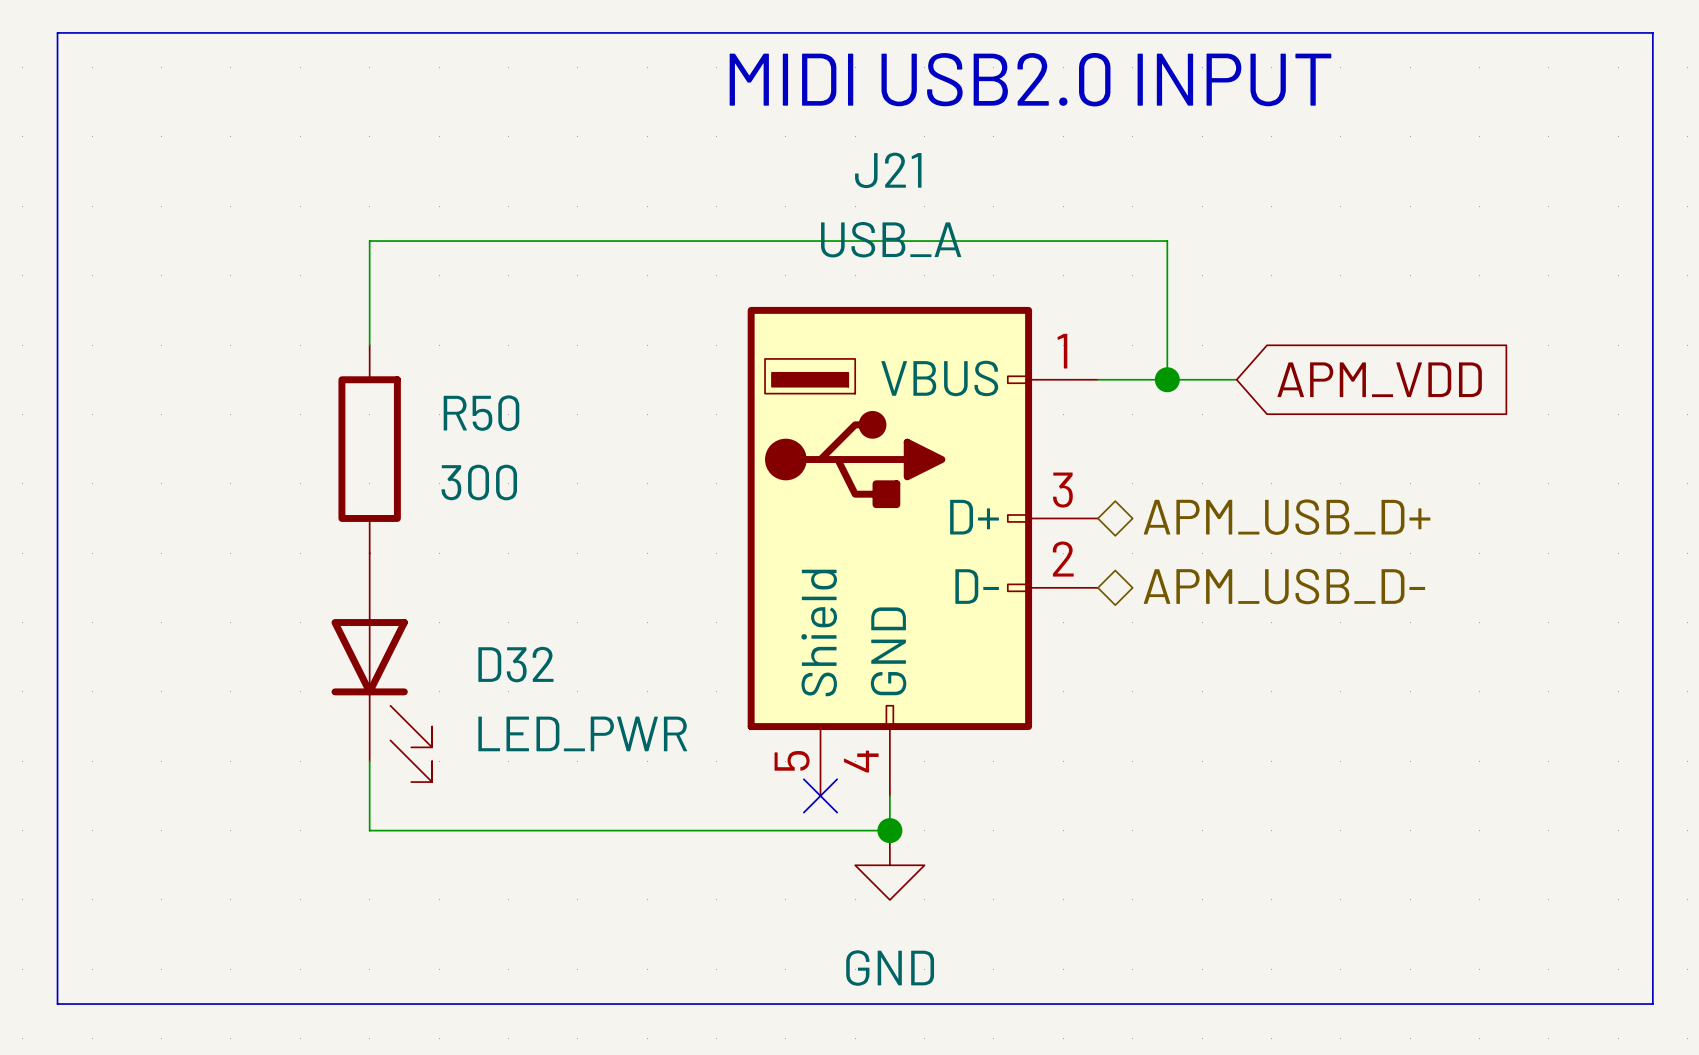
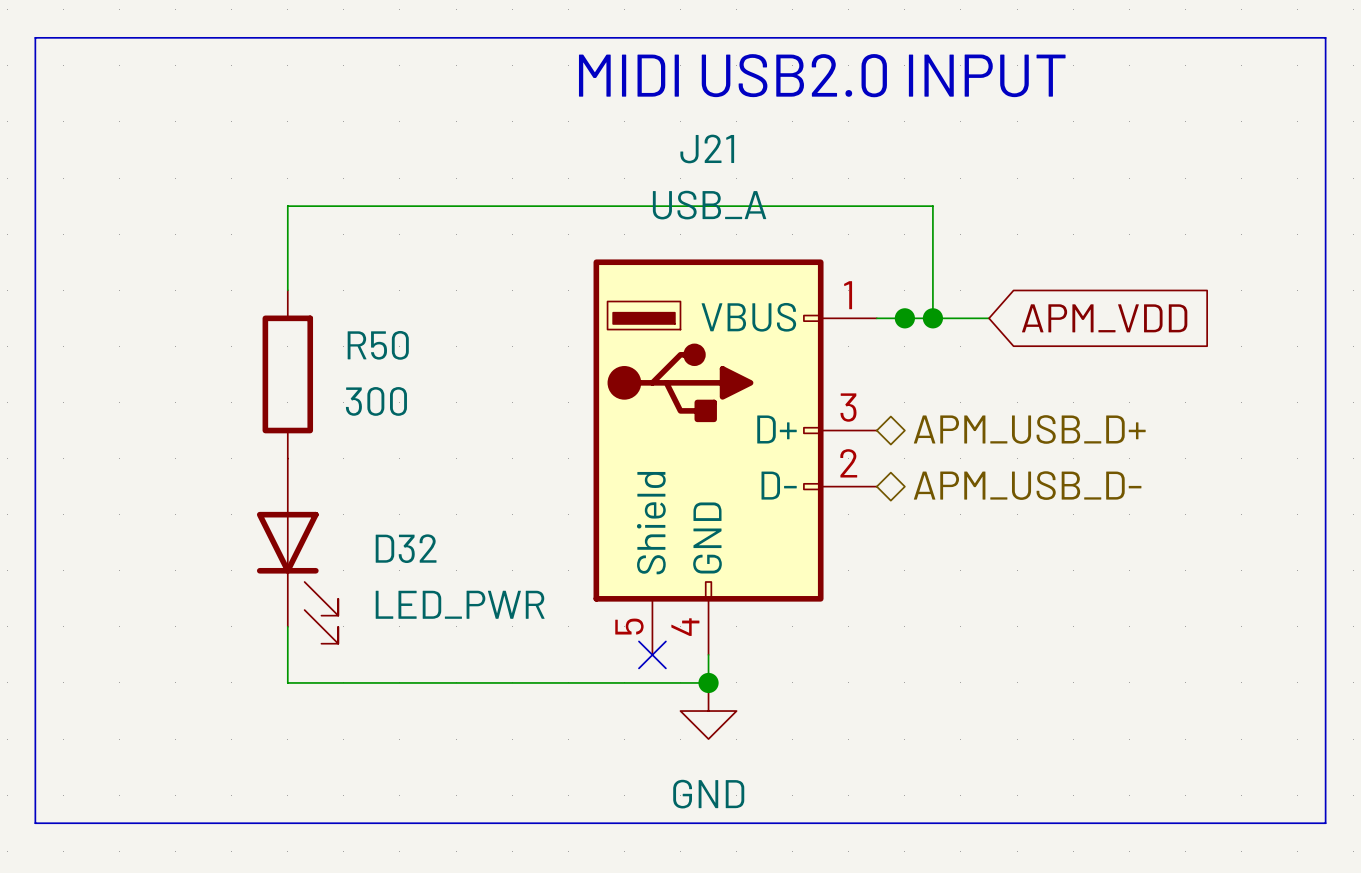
junction: none -> (904, 318)

